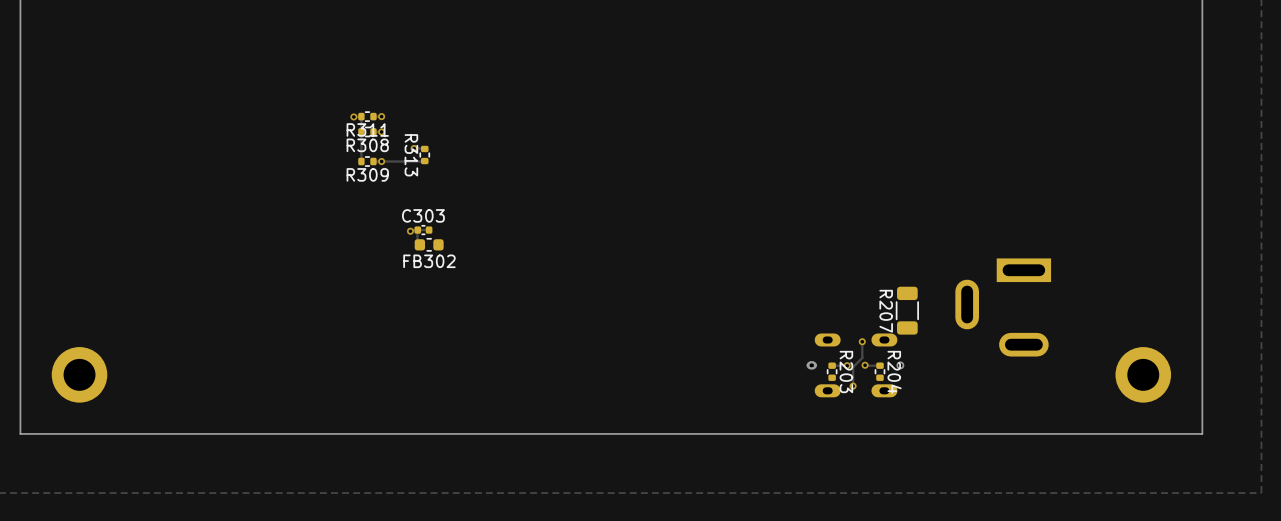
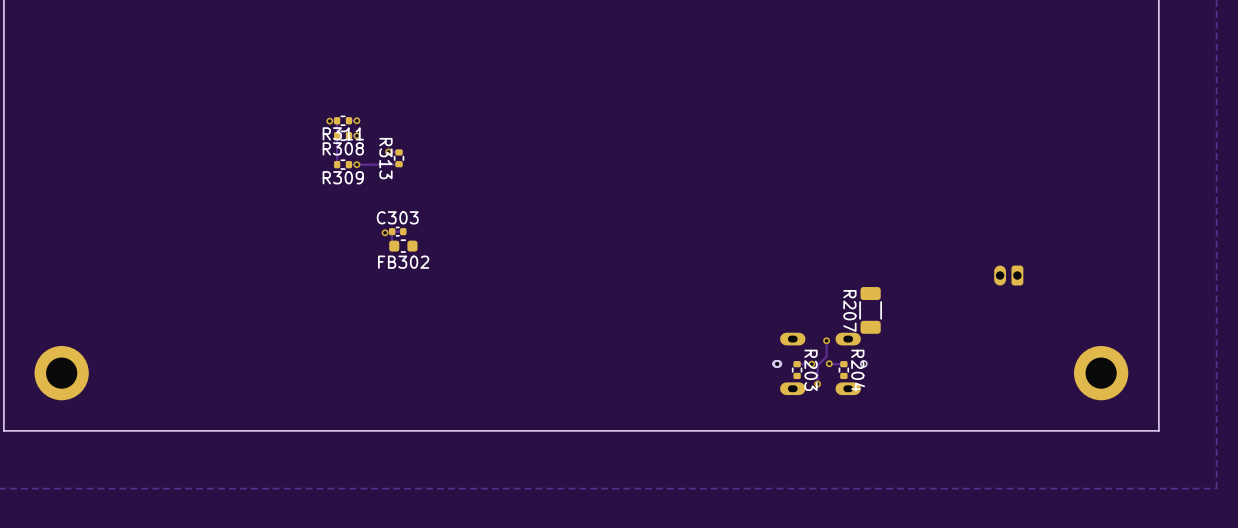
part: none -> (1008, 275)
part: (1003, 307) -> none

